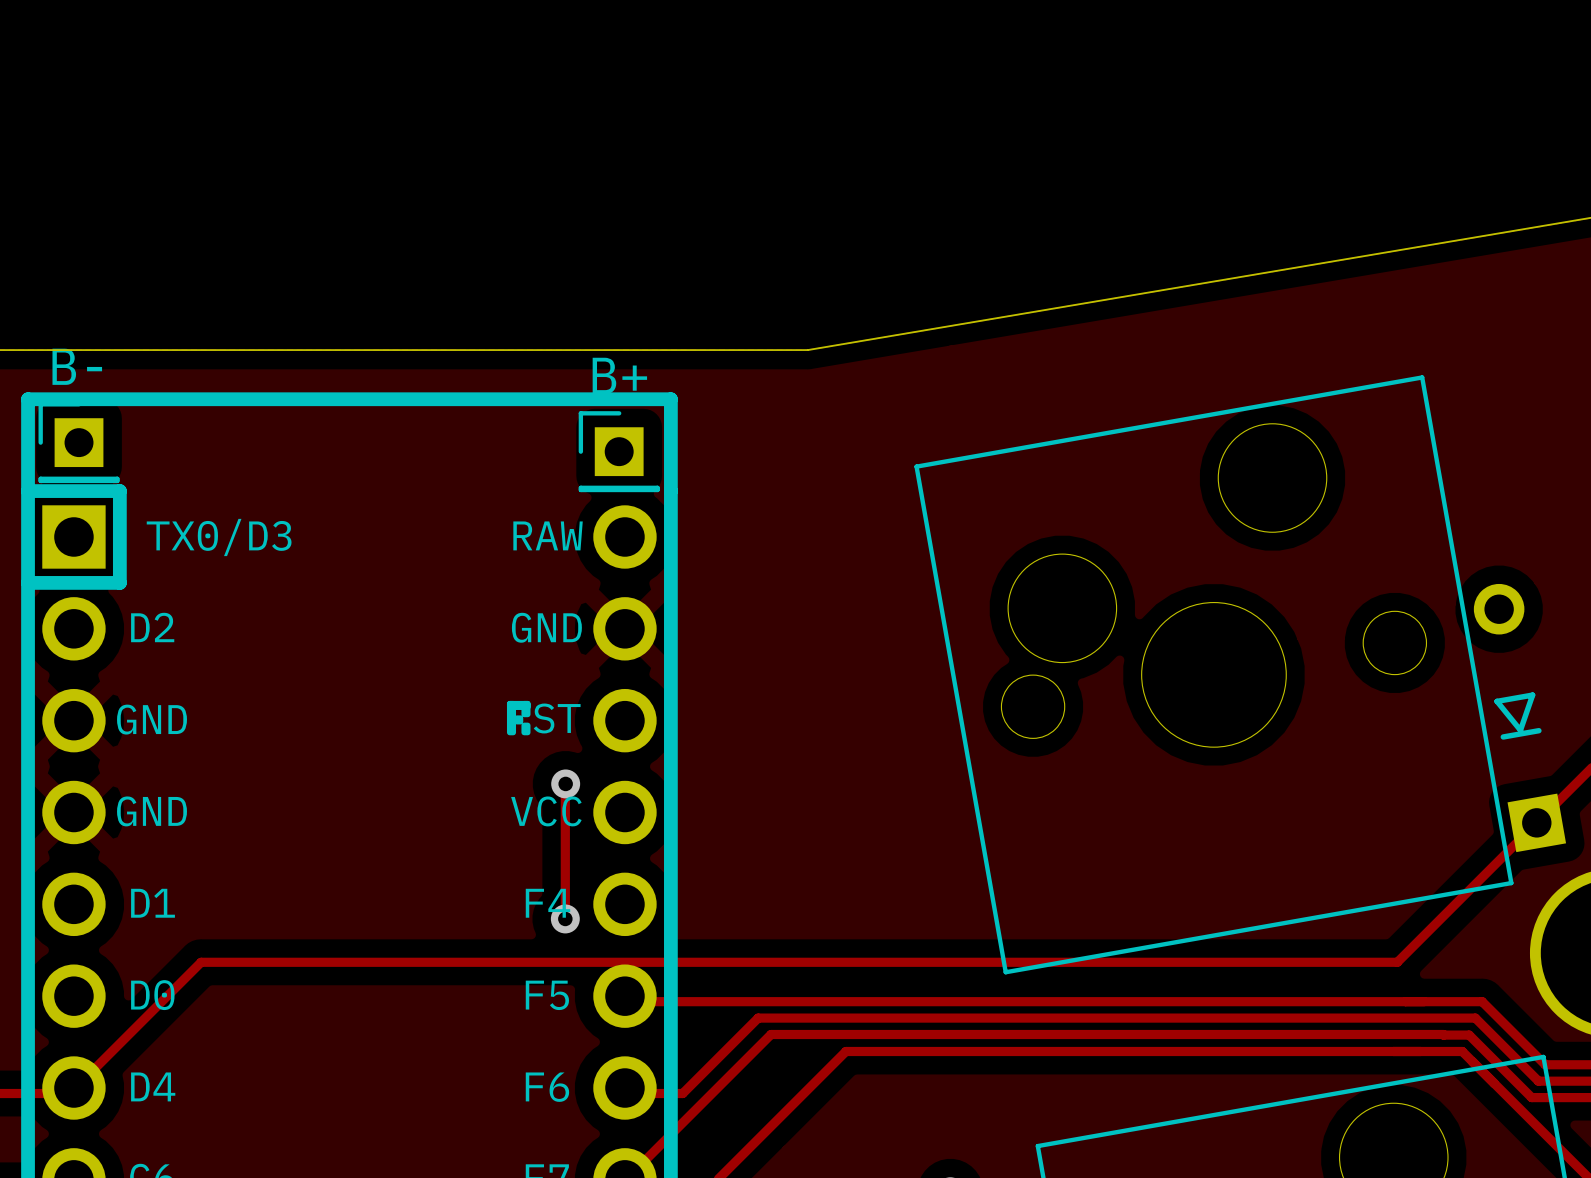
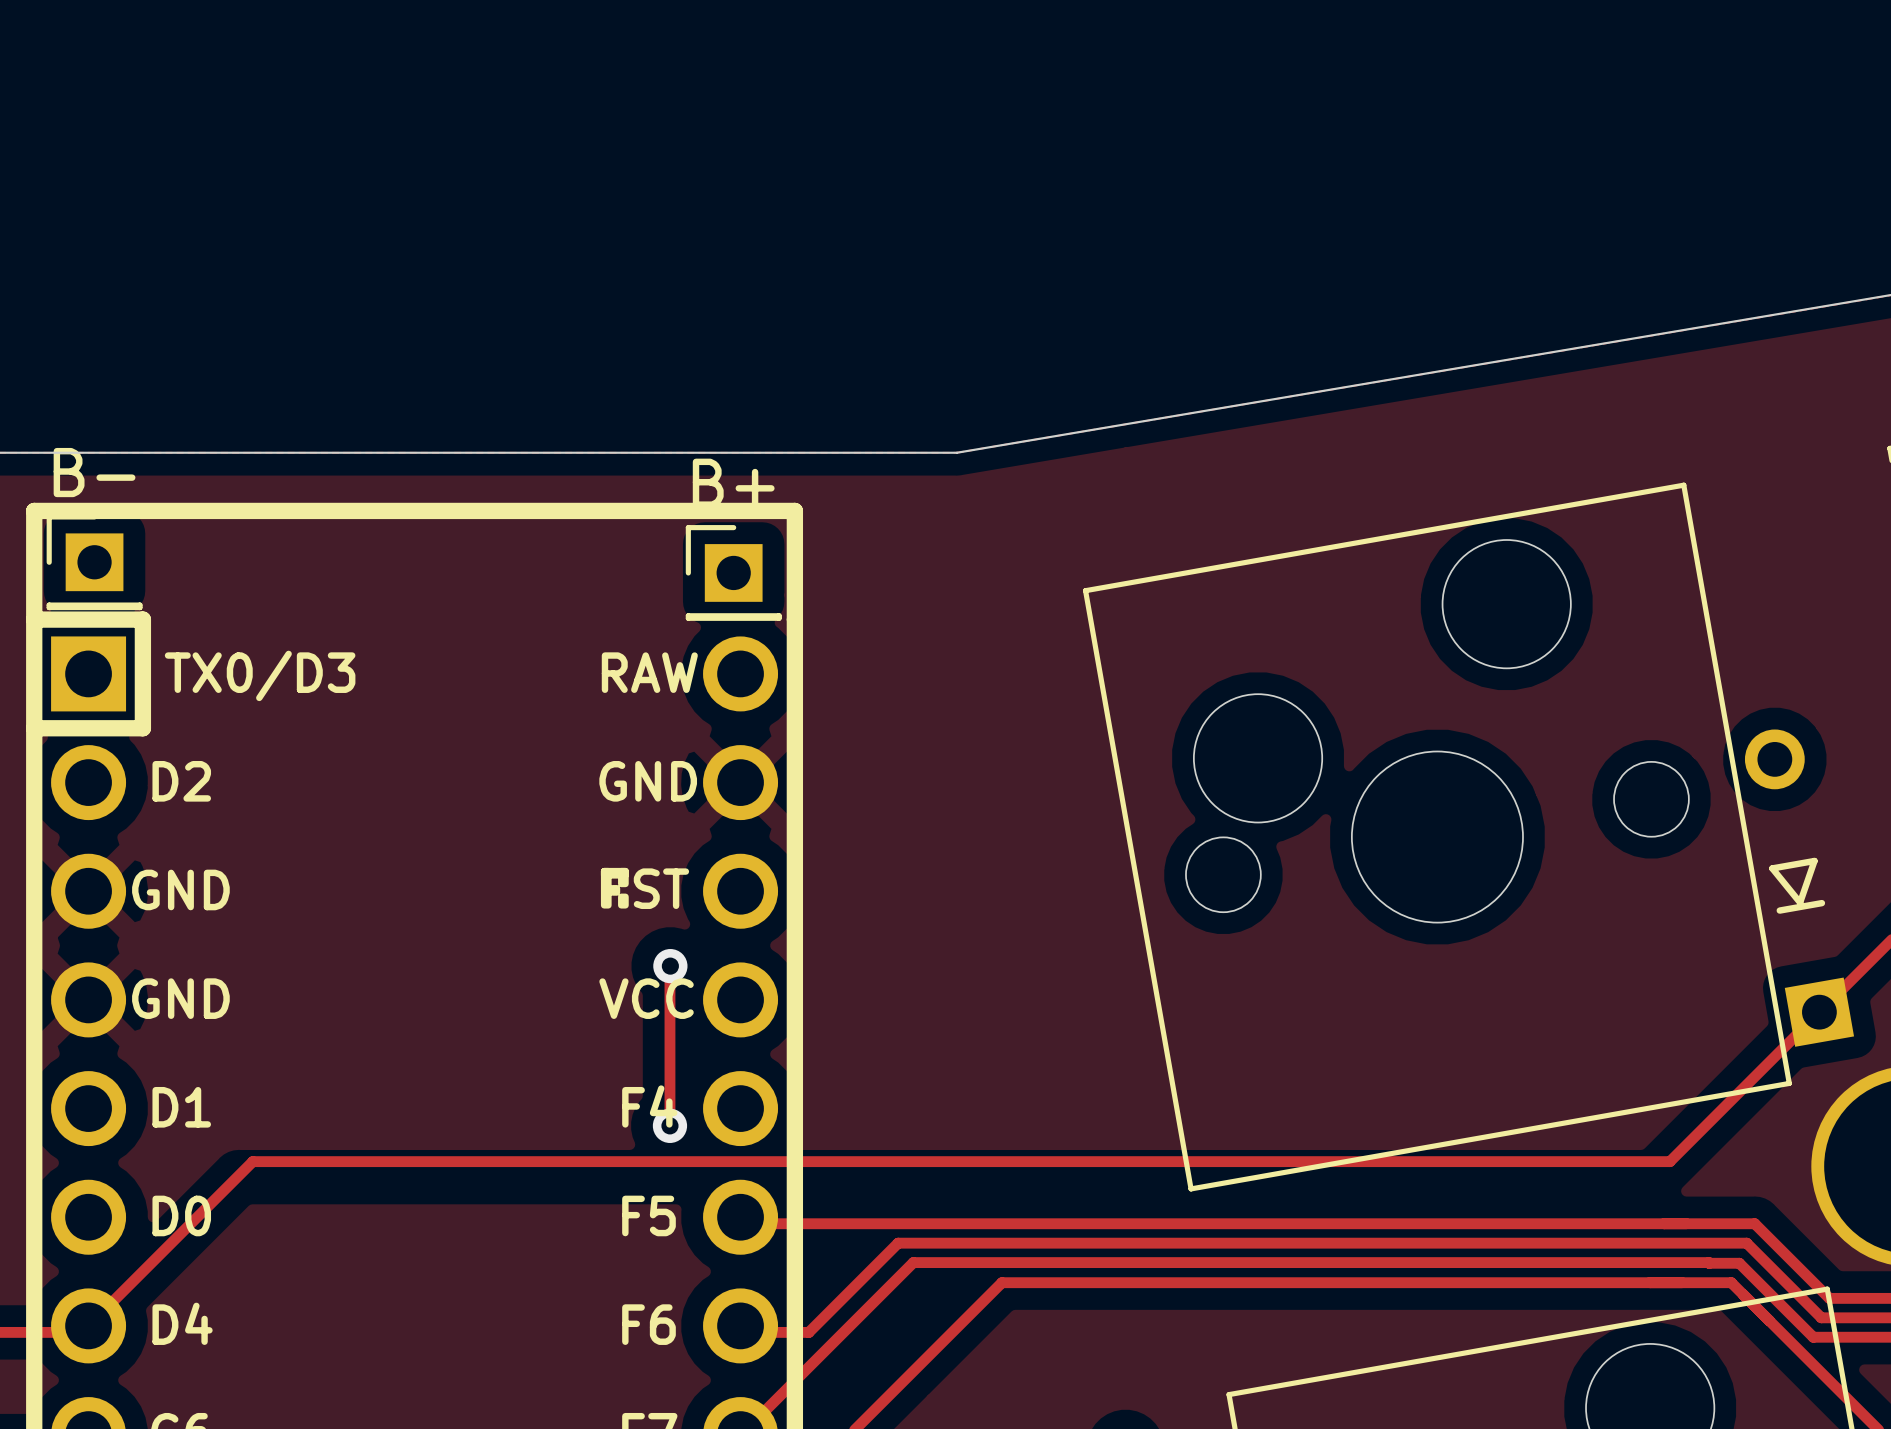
track: (1410, 949) (1397, 962) (201, 962) (69, 1093) -> (1669, 1161) (252, 1161) (88, 1325)

